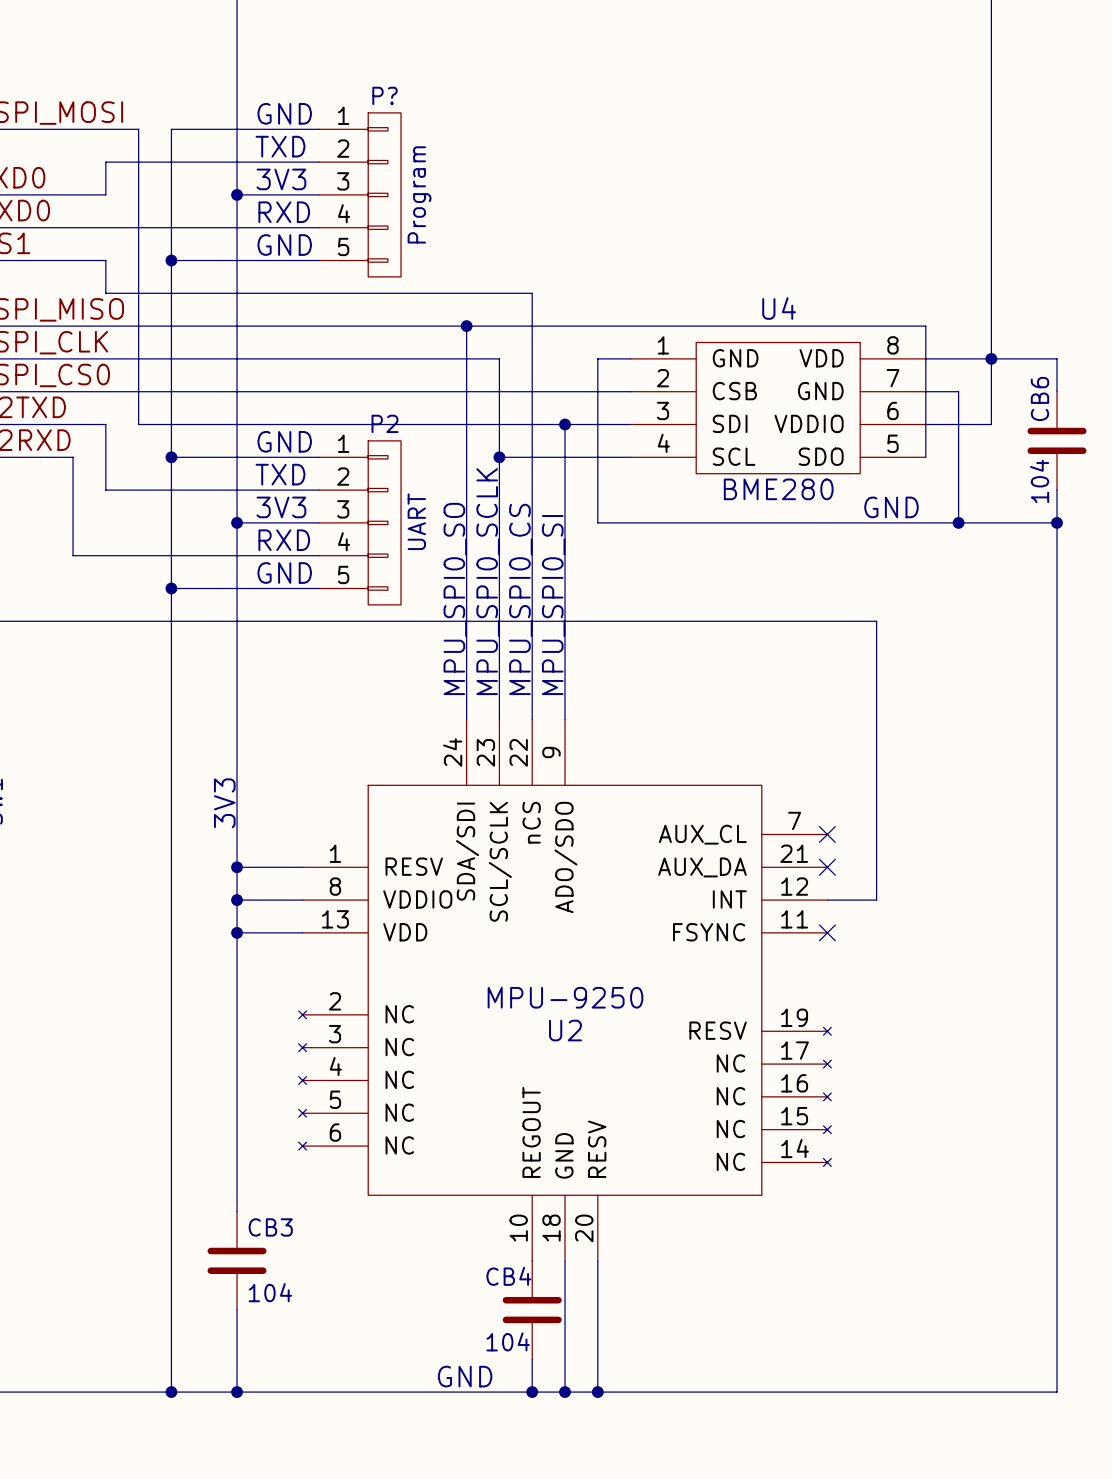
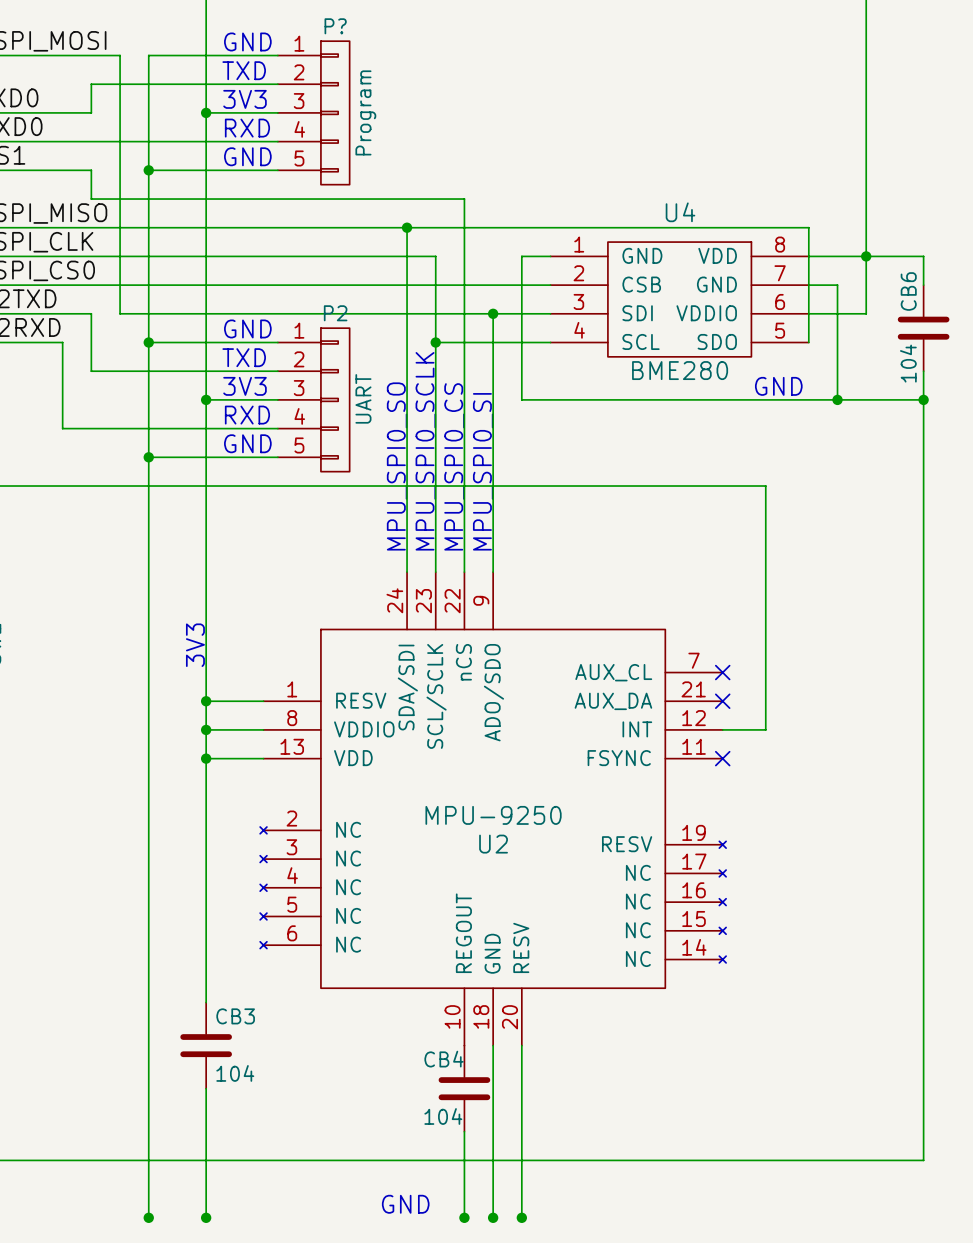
text position: GND (465, 1376) -> GND (405, 1204)
wire: none -> (148, 1160) (148, 1217)
junction: (171, 1392) -> none
wire: none -> (206, 1160) (206, 1217)
junction: (237, 1392) -> none
wire: none -> (464, 1160) (464, 1217)
junction: (532, 1392) -> none
wire: none -> (493, 1160) (493, 1217)
junction: (565, 1392) -> none
wire: none -> (521, 1160) (521, 1217)
junction: (597, 1392) -> none
junction: none -> (148, 1217)
junction: none -> (206, 1217)
junction: none -> (464, 1217)
junction: none -> (493, 1217)
junction: none -> (521, 1217)

